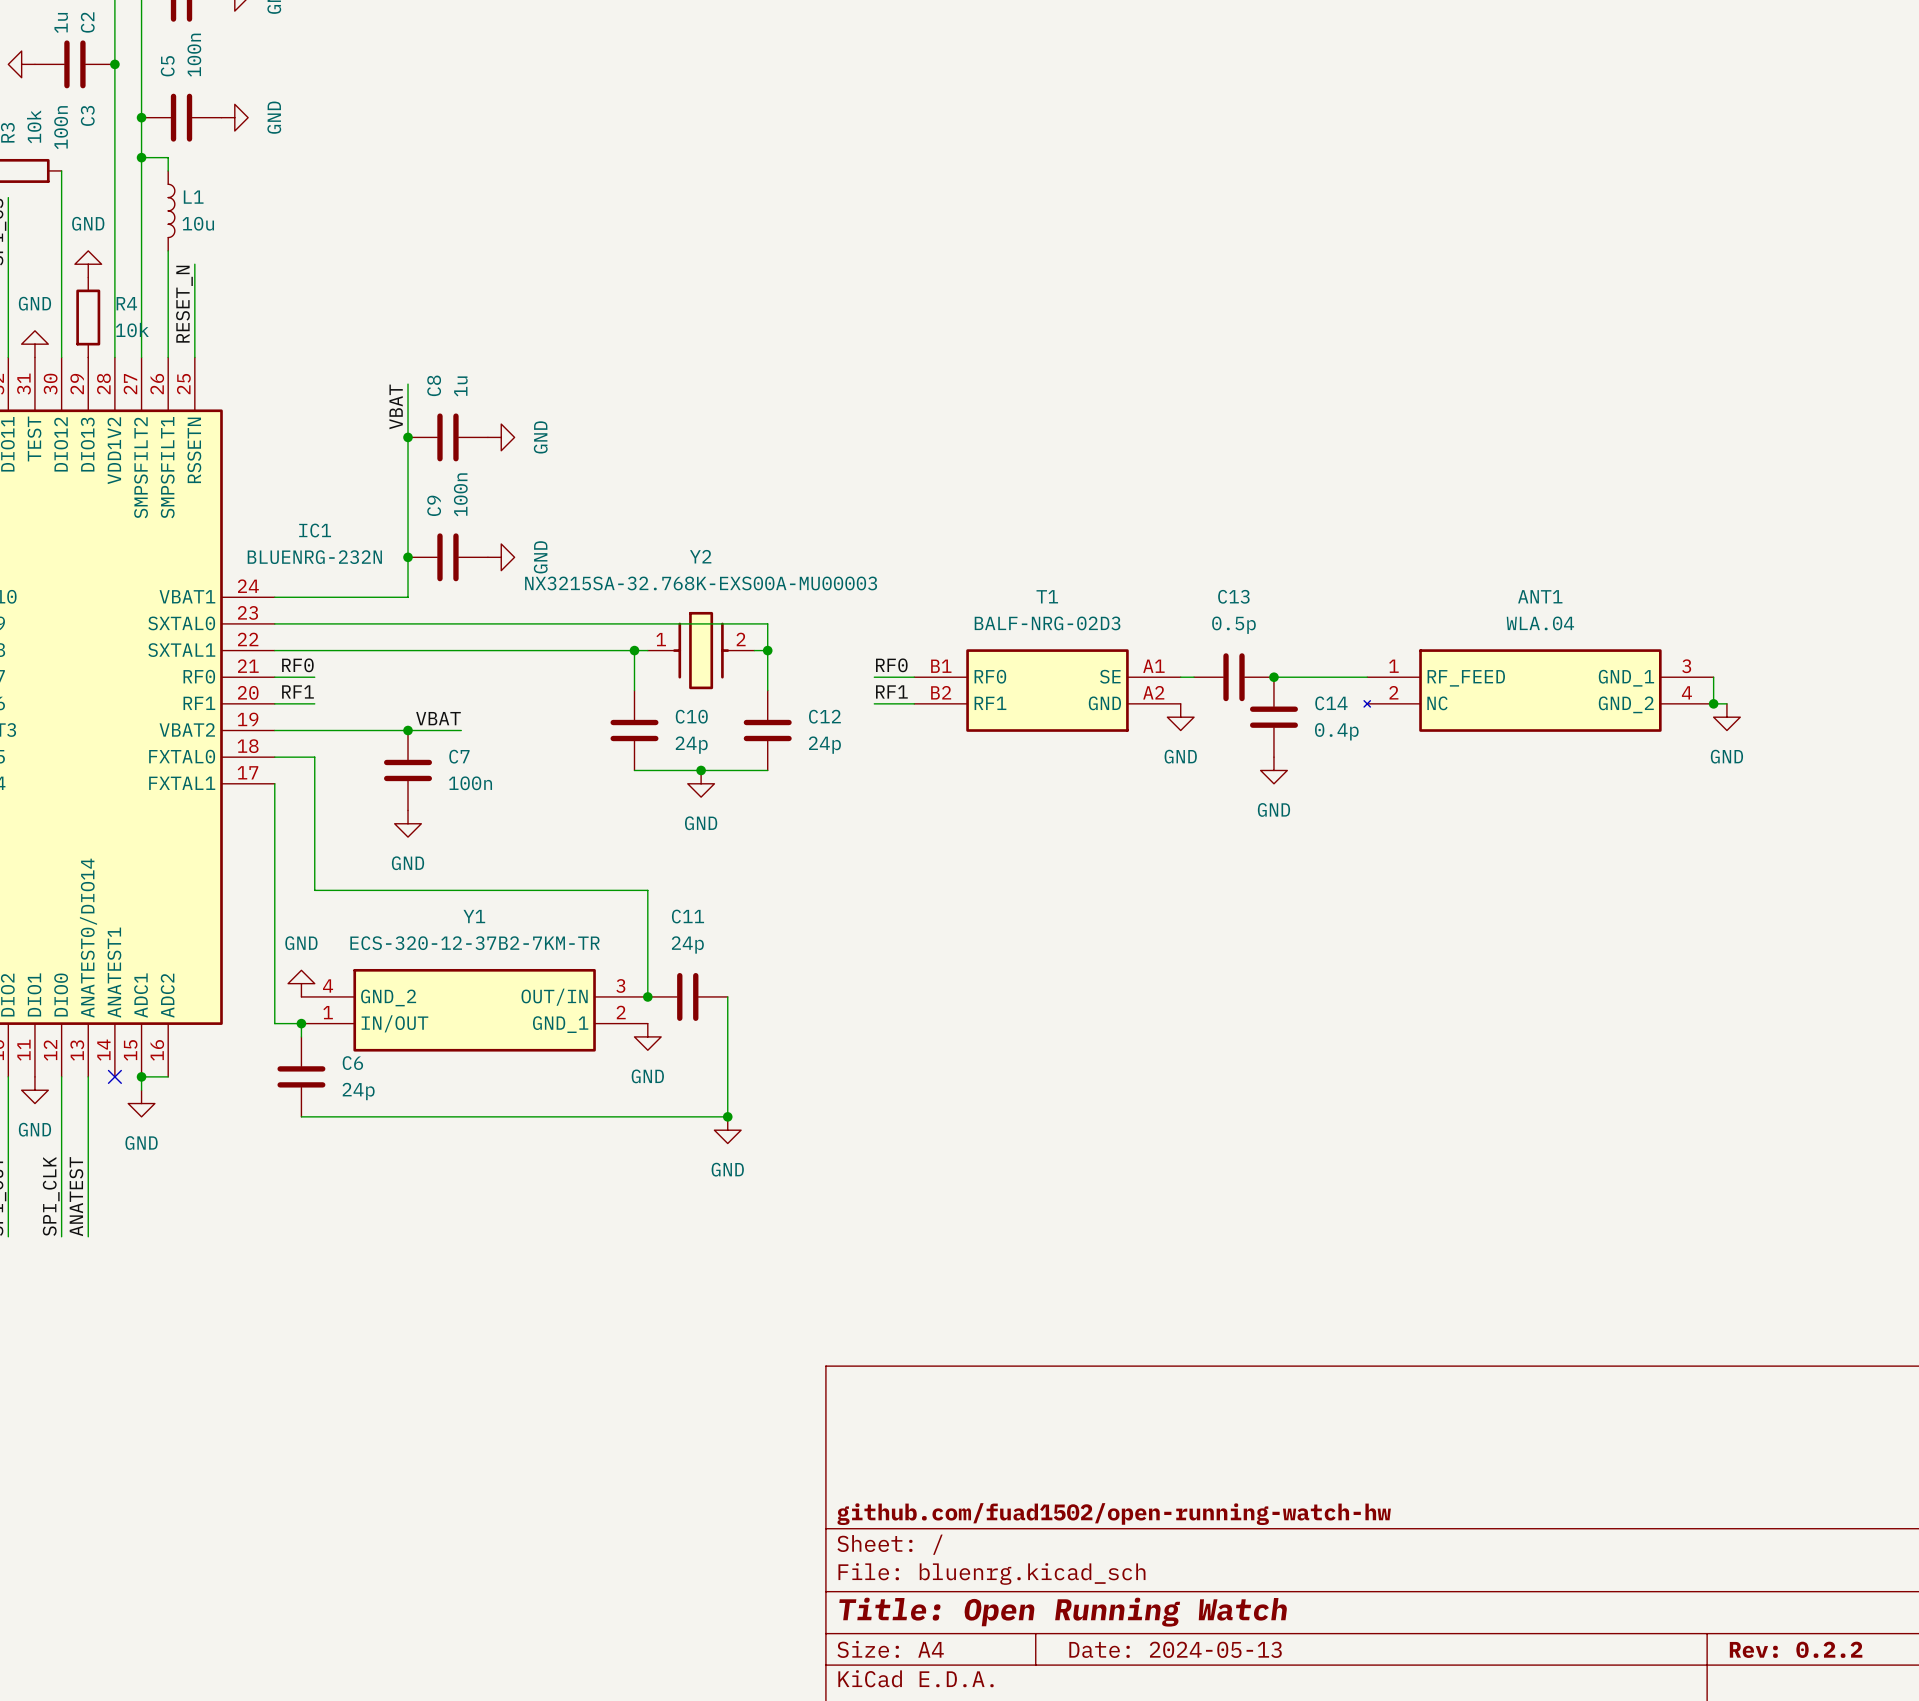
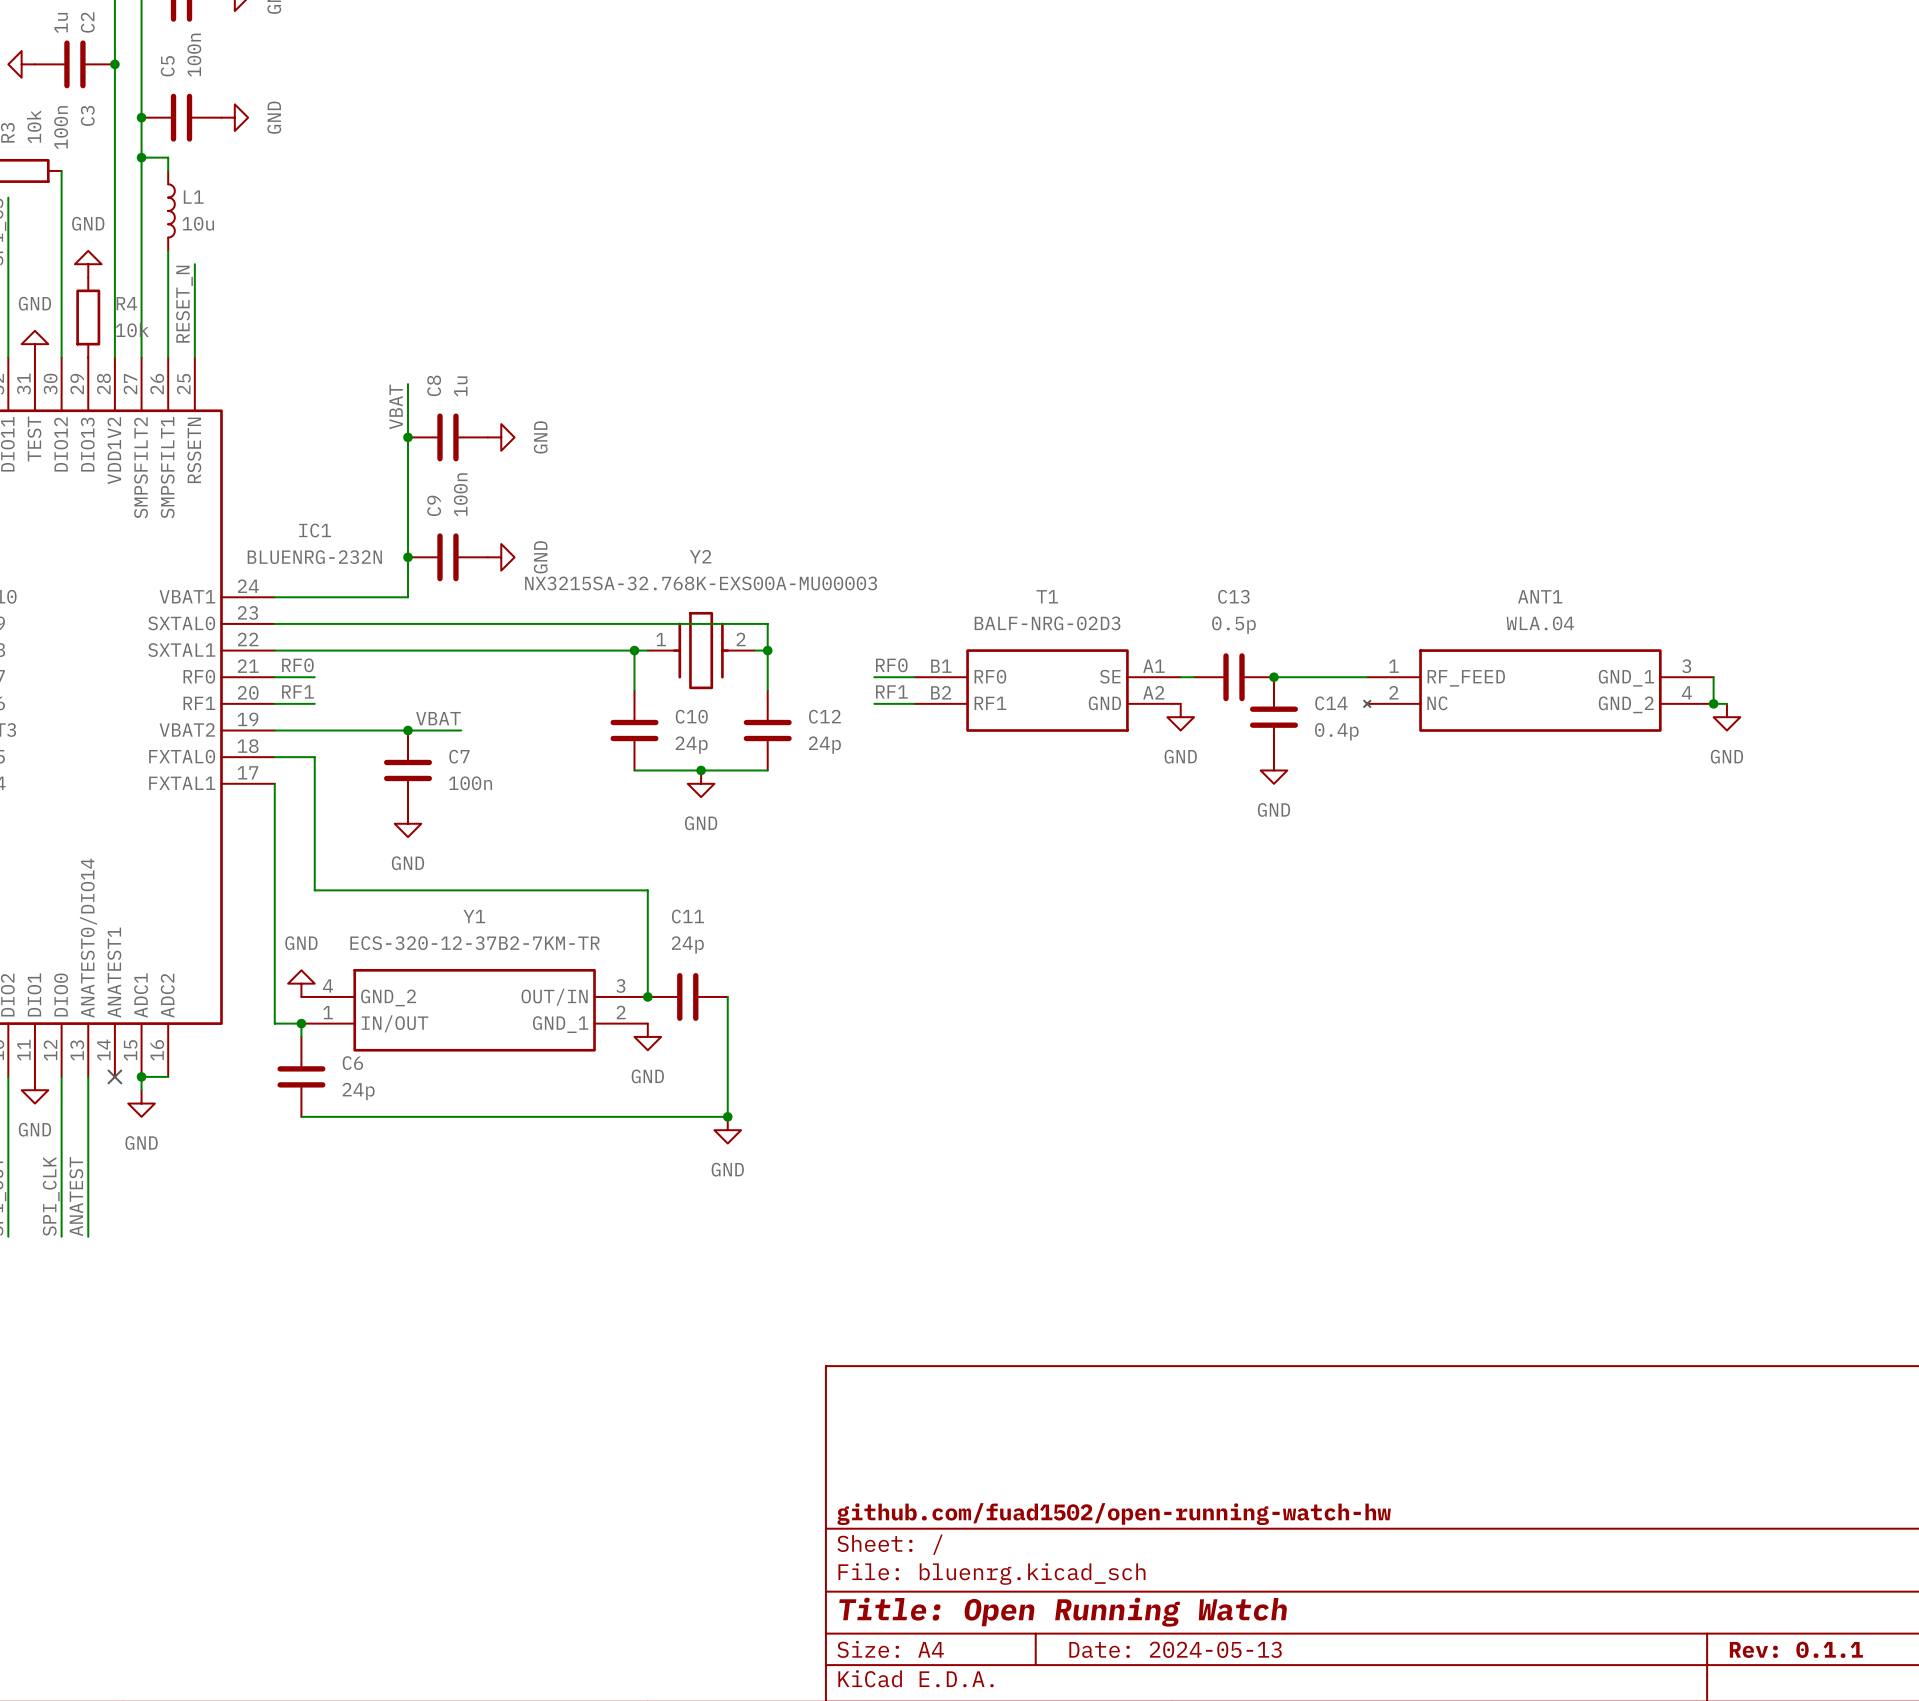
title block: Rev: 0.2.2 (1796, 1649) -> Rev: 0.1.1 (1796, 1649)

